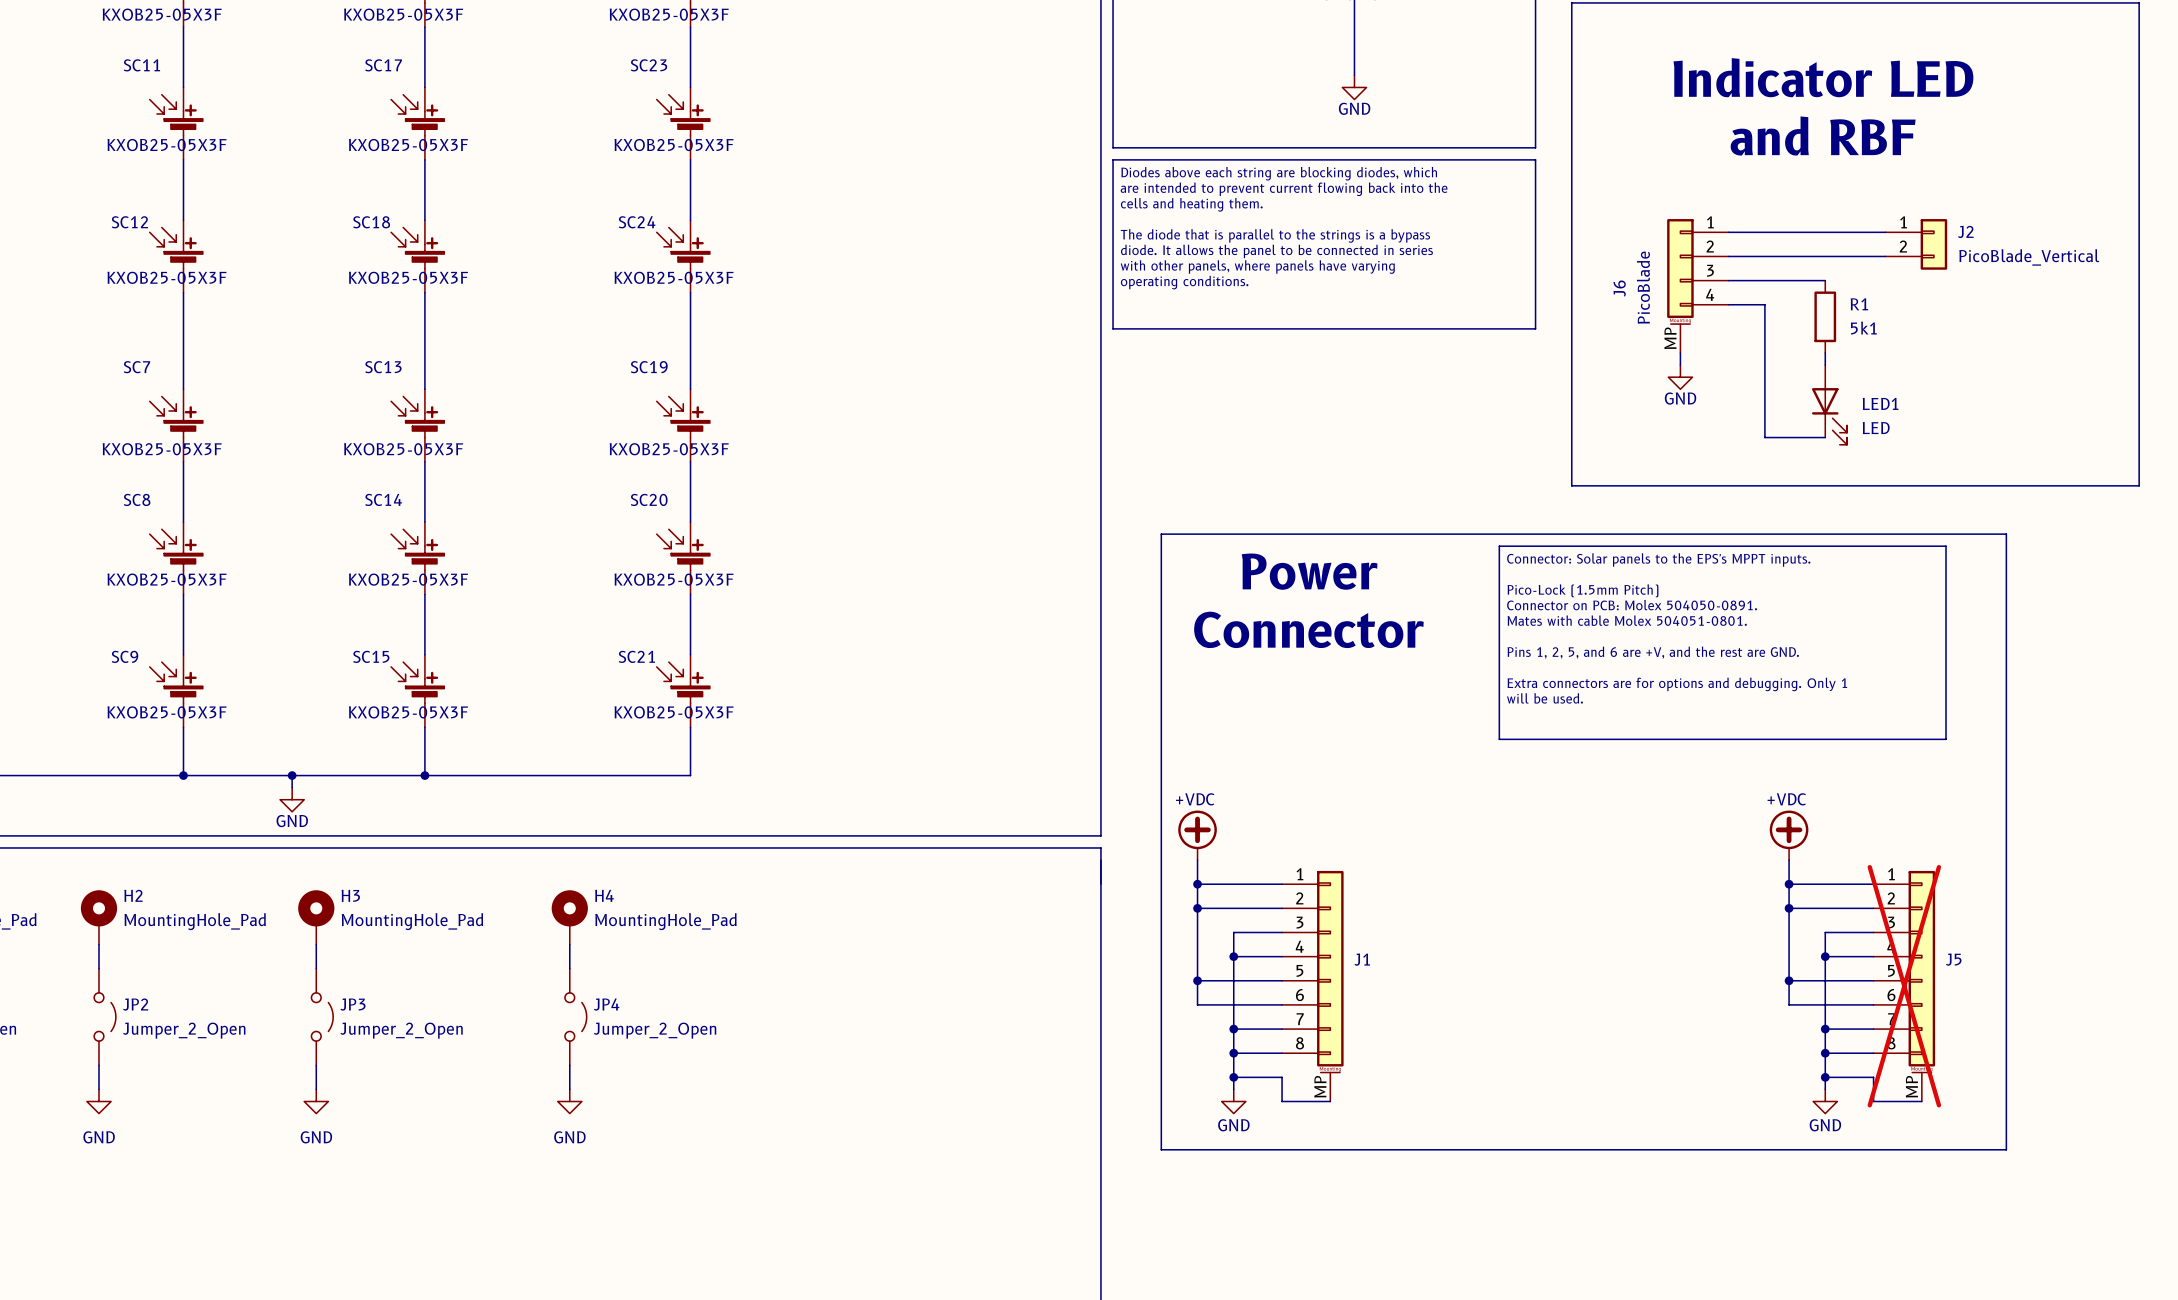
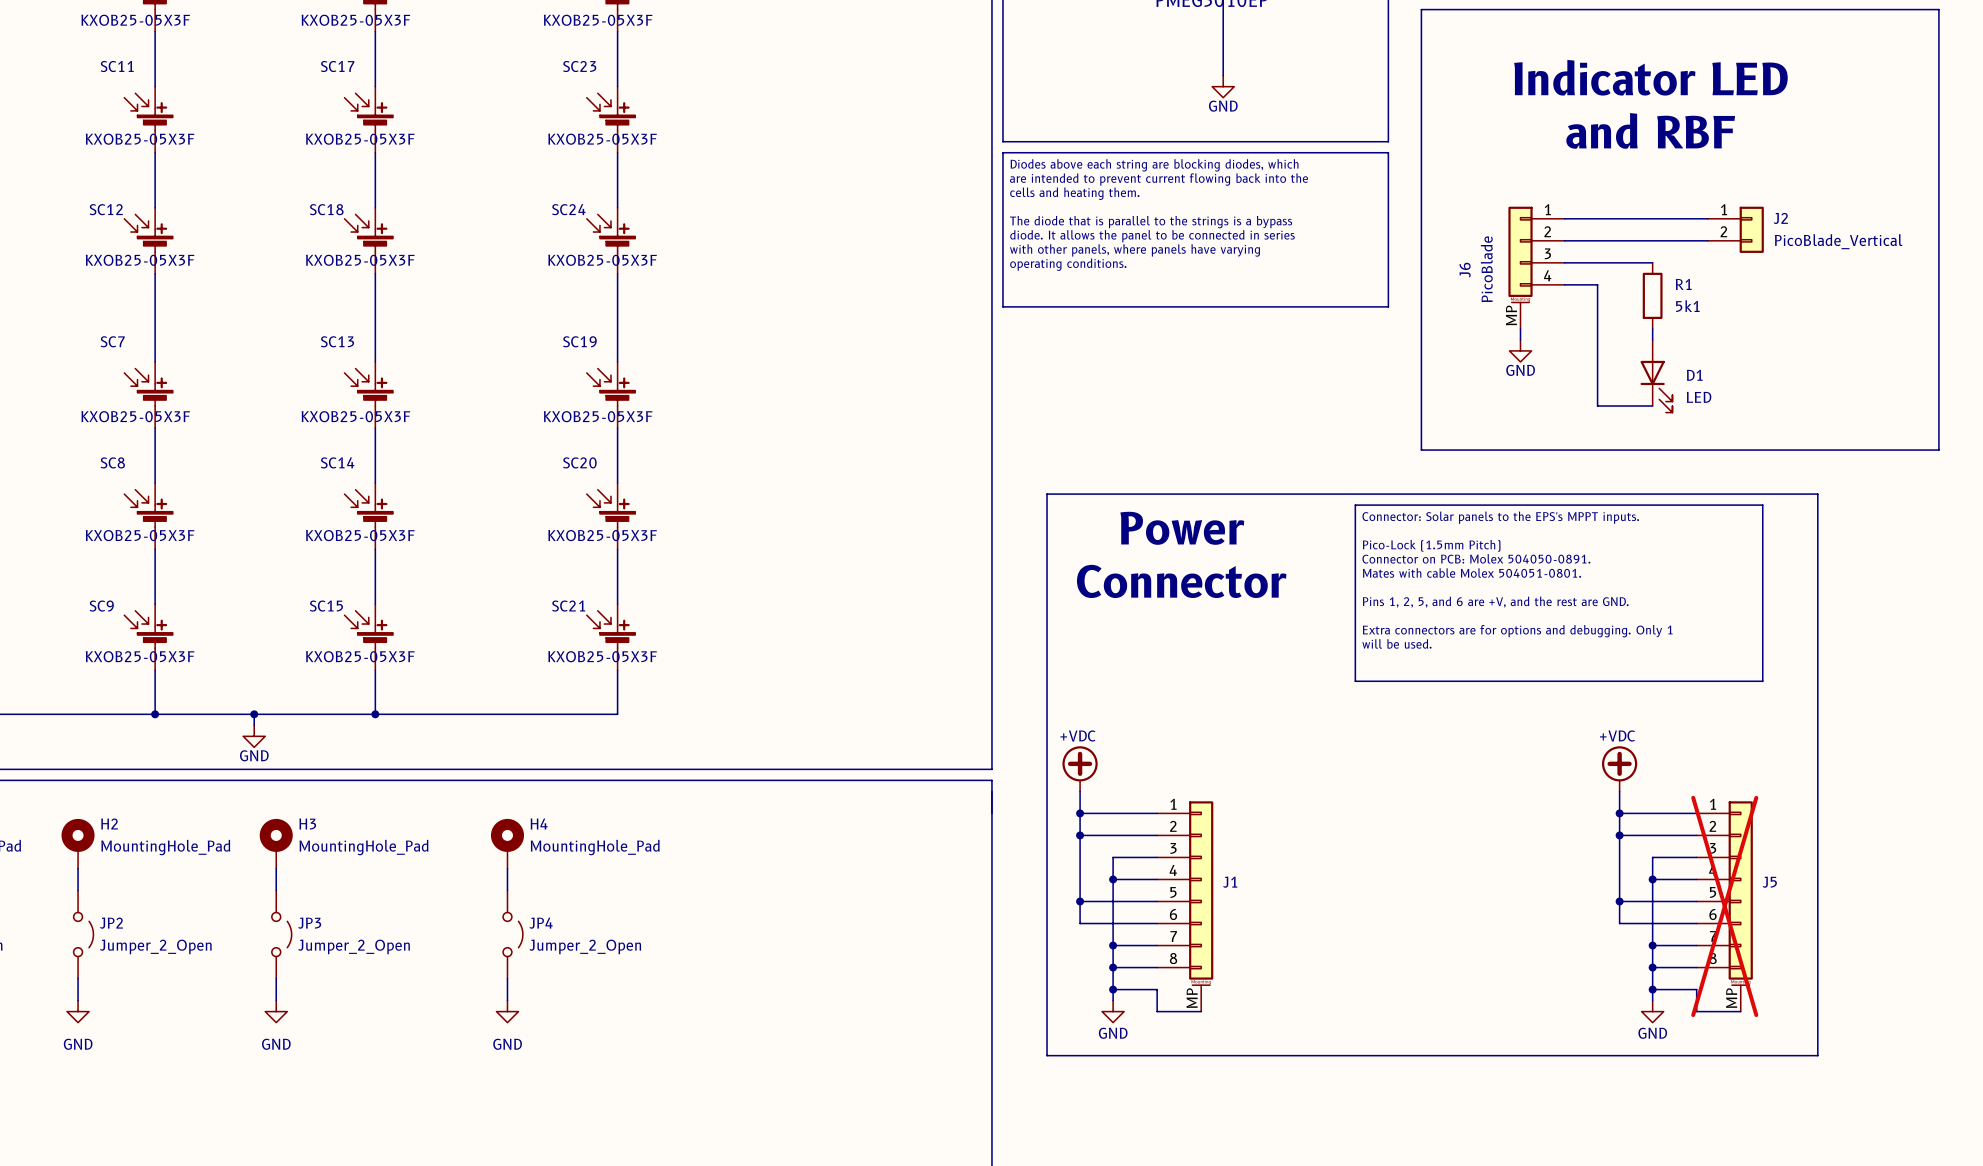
LED1 name: LED1 (1880, 403) -> D1 (1694, 375)

